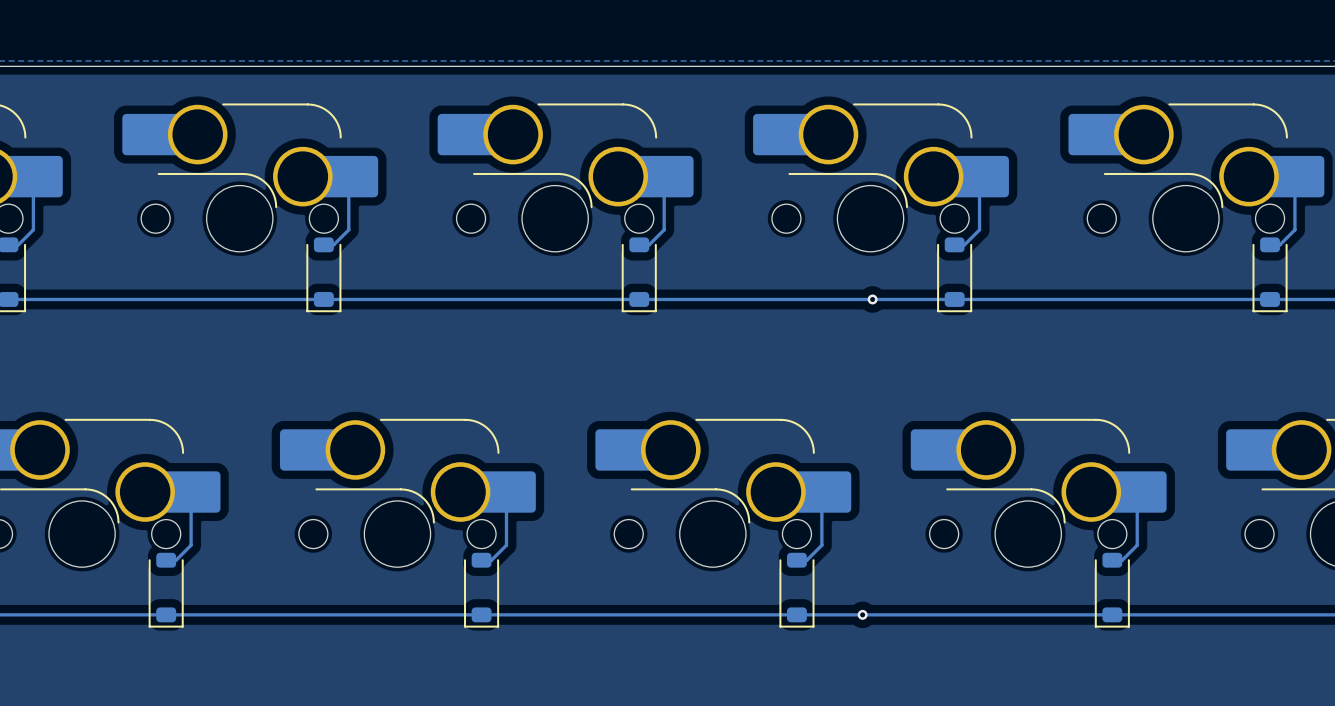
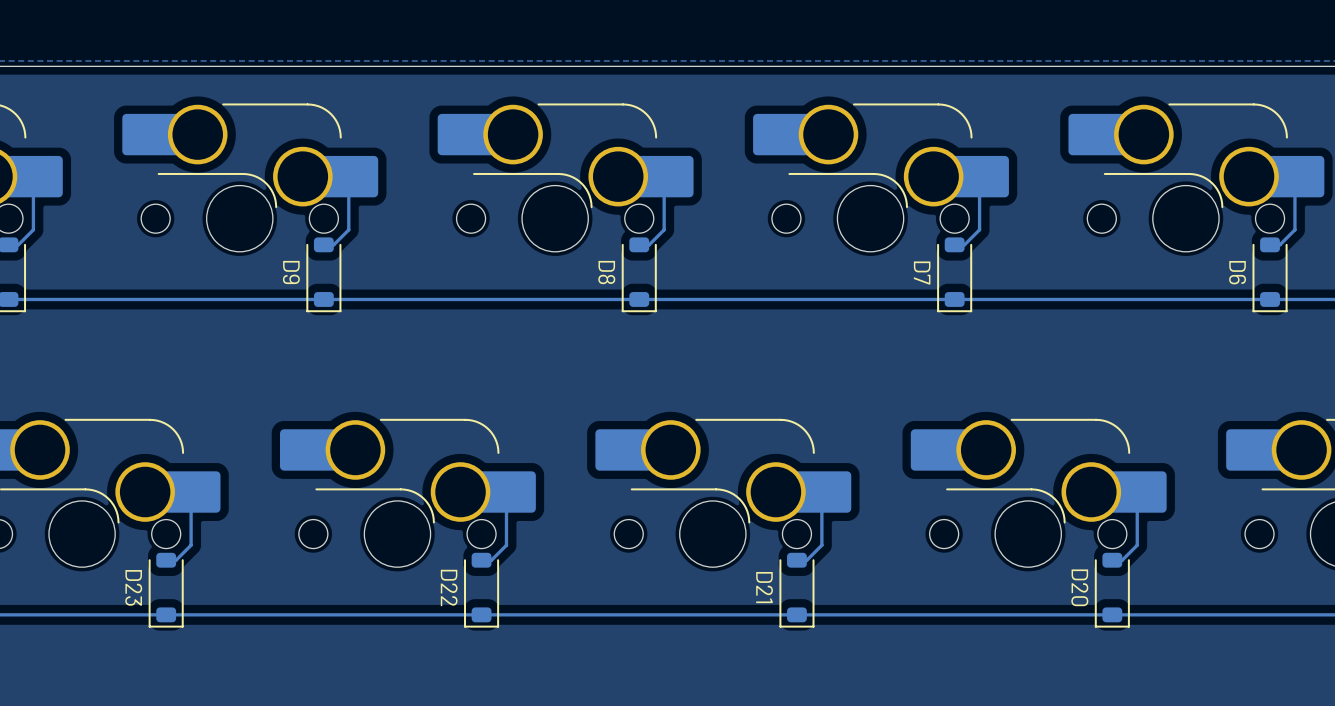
D9 name: none -> D9 (291, 272)
D8 name: none -> D8 (606, 272)
D6 name: none -> D6 (1237, 272)
D7 name: none -> D7 (922, 273)
via: (872, 299) -> none
D23 name: none -> D23 (133, 587)
D22 name: none -> D22 (449, 587)
D21 name: none -> D21 (764, 587)
D20 name: none -> D20 (1079, 587)
via: (862, 614) -> none

